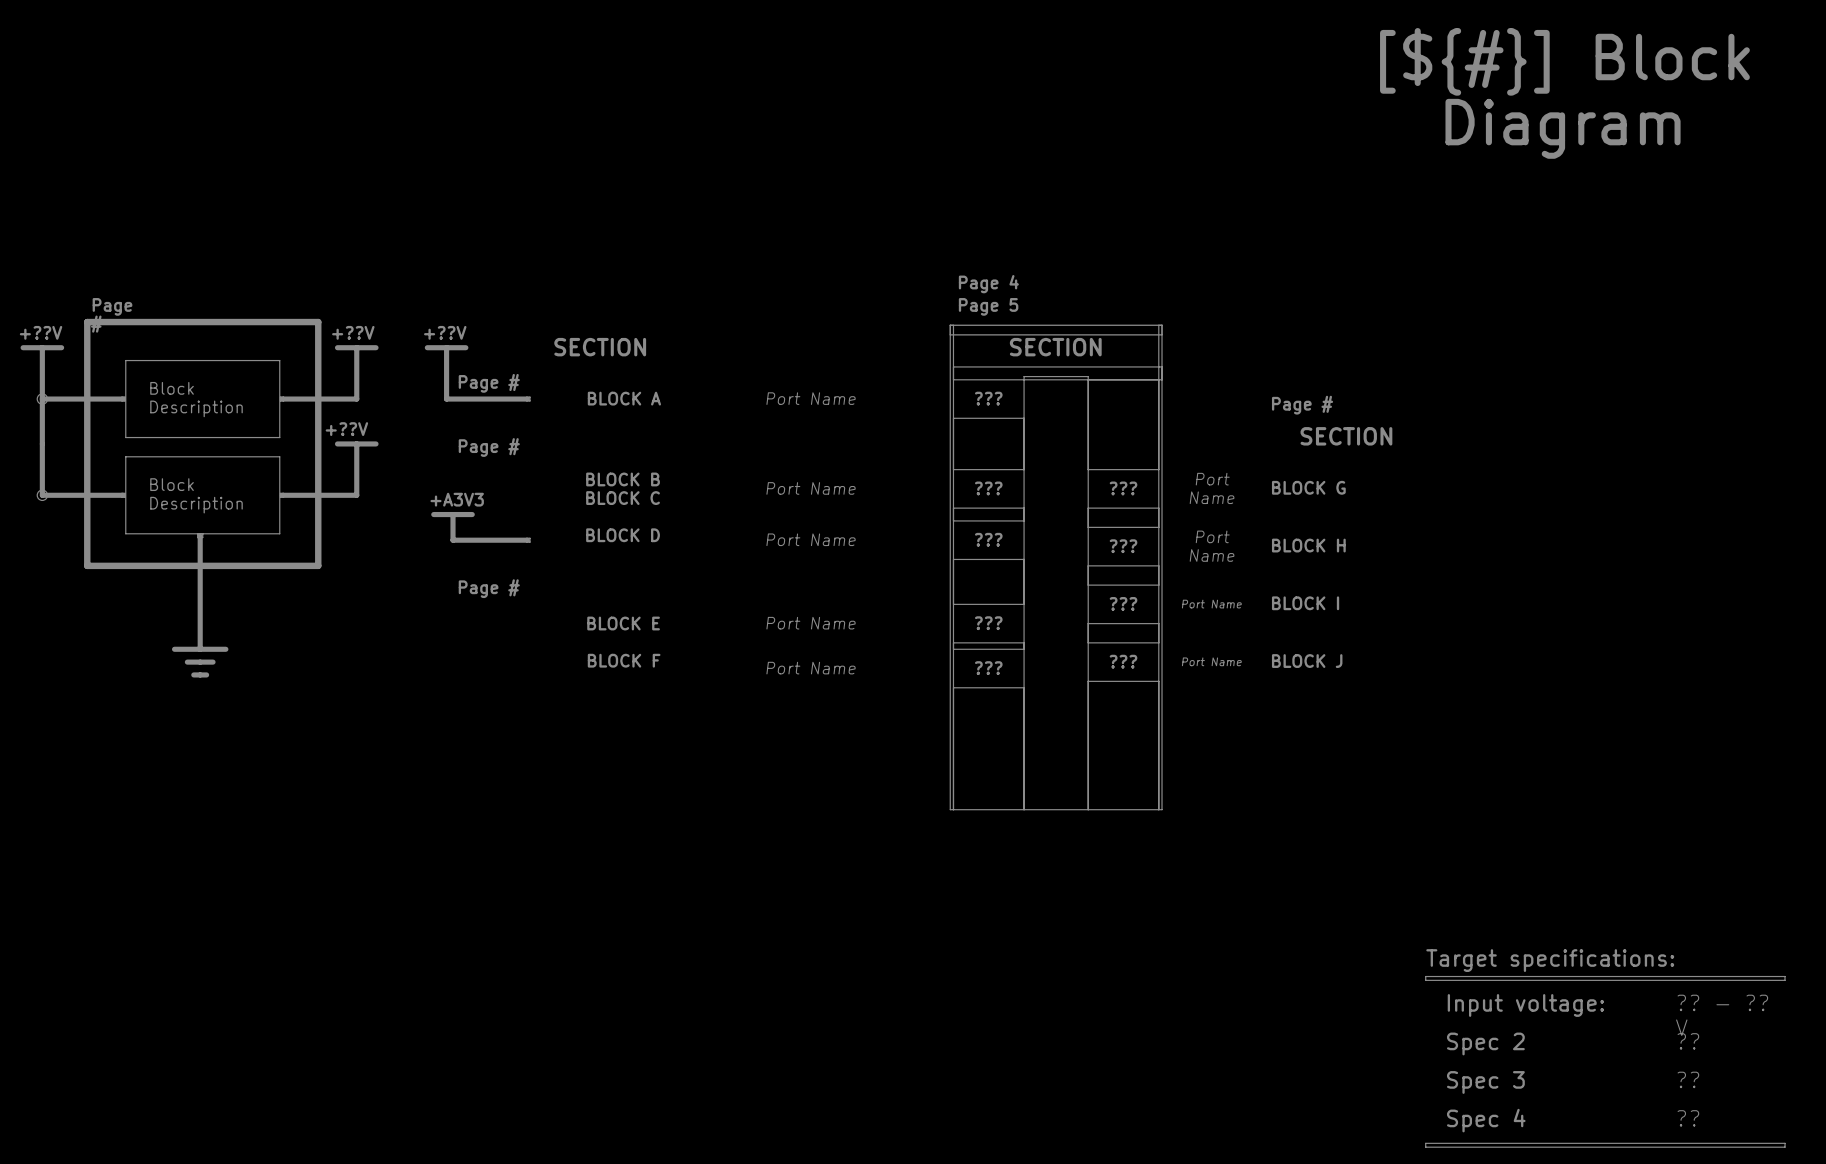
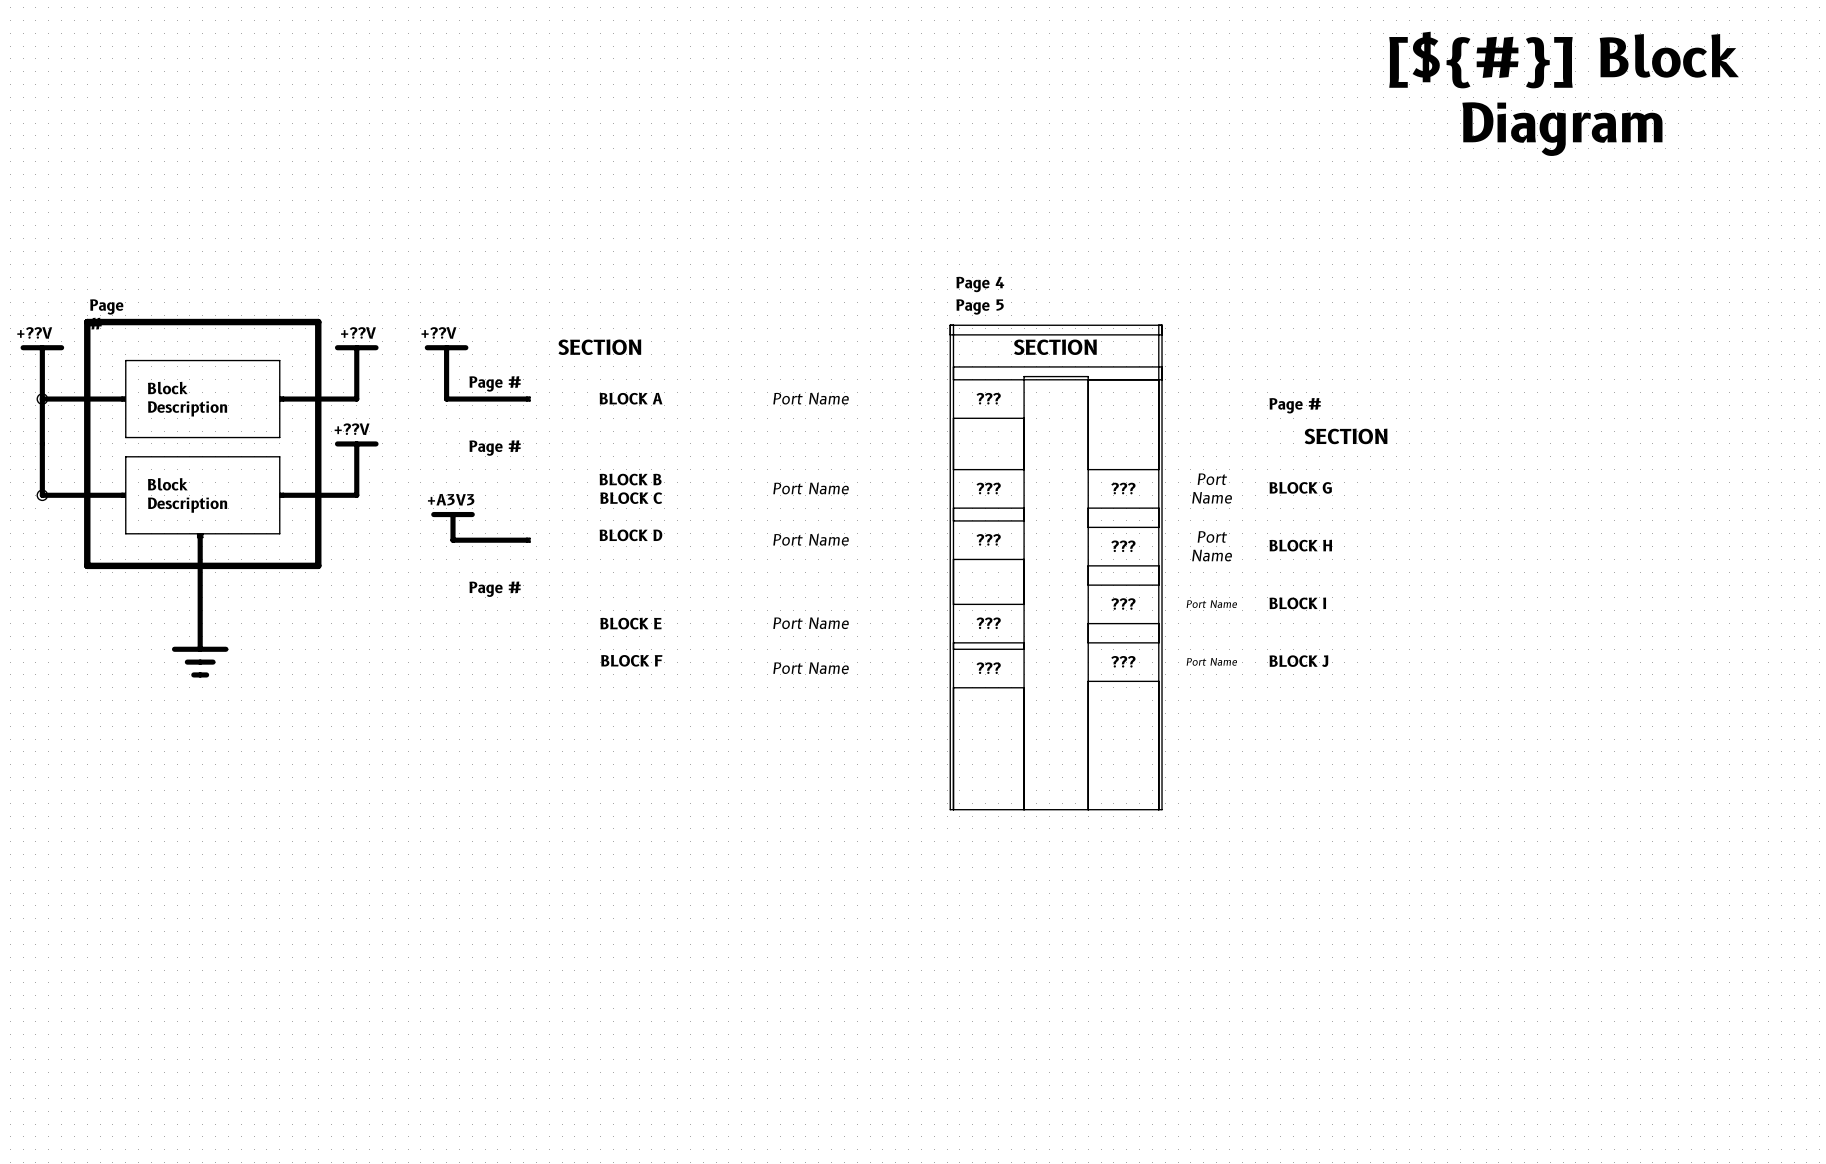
text: Target specifications: (1550, 960) -> none
line: (1425, 976) (1425, 980) (1785, 980) (1785, 976) (1425, 976) -> none
text: ?? - ?? (1722, 1002) -> none
text: Input voltage: (1525, 1005) -> none
text: V (1681, 1027) -> none
text: ?? (1688, 1041) -> none
text: Spec 2 (1485, 1043) -> none
text: ?? (1688, 1079) -> none
text: Spec 3 (1485, 1082) -> none
text: ?? (1688, 1118) -> none
text: Spec 4 (1486, 1120) -> none
line: (1425, 1143) (1785, 1143) (1785, 1147) (1425, 1147) (1425, 1143) -> none

